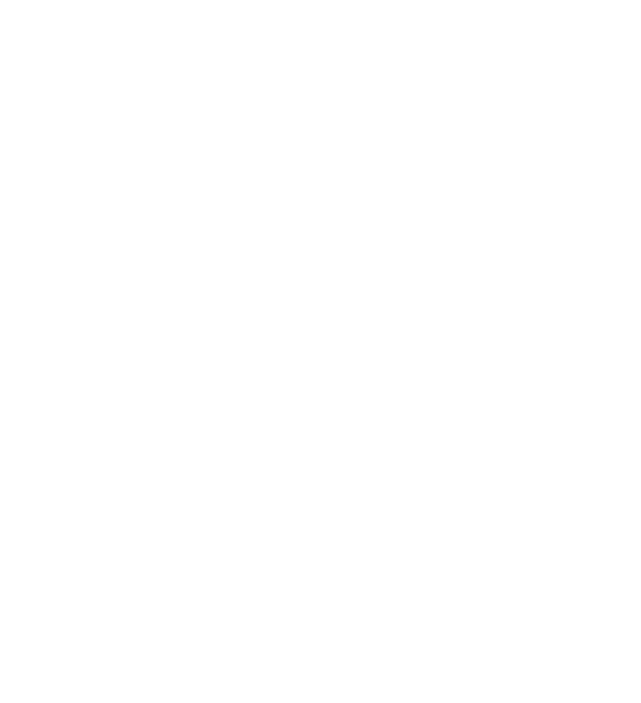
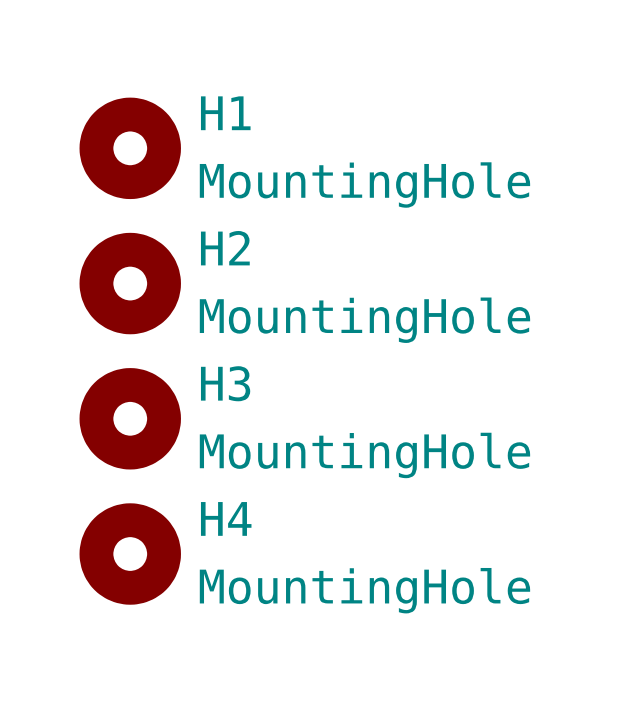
H1: none -> MountingHole (130, 148)
H2: none -> MountingHole (130, 283)
H3: none -> MountingHole (130, 418)
H4: none -> MountingHole (130, 554)

